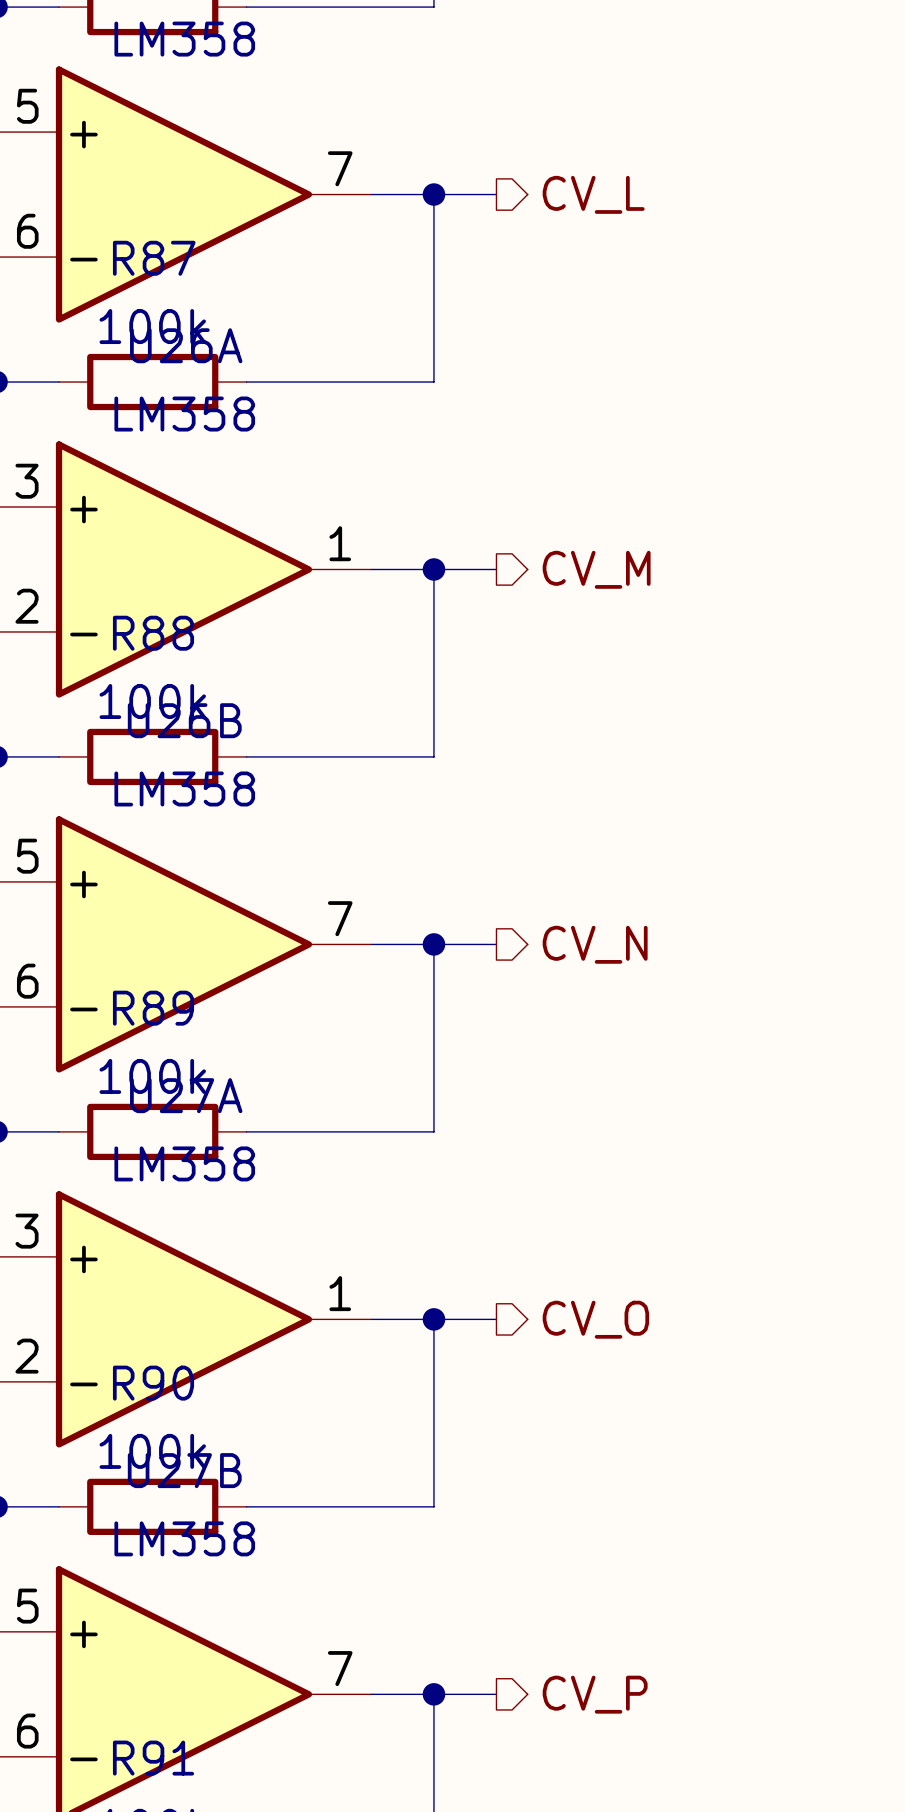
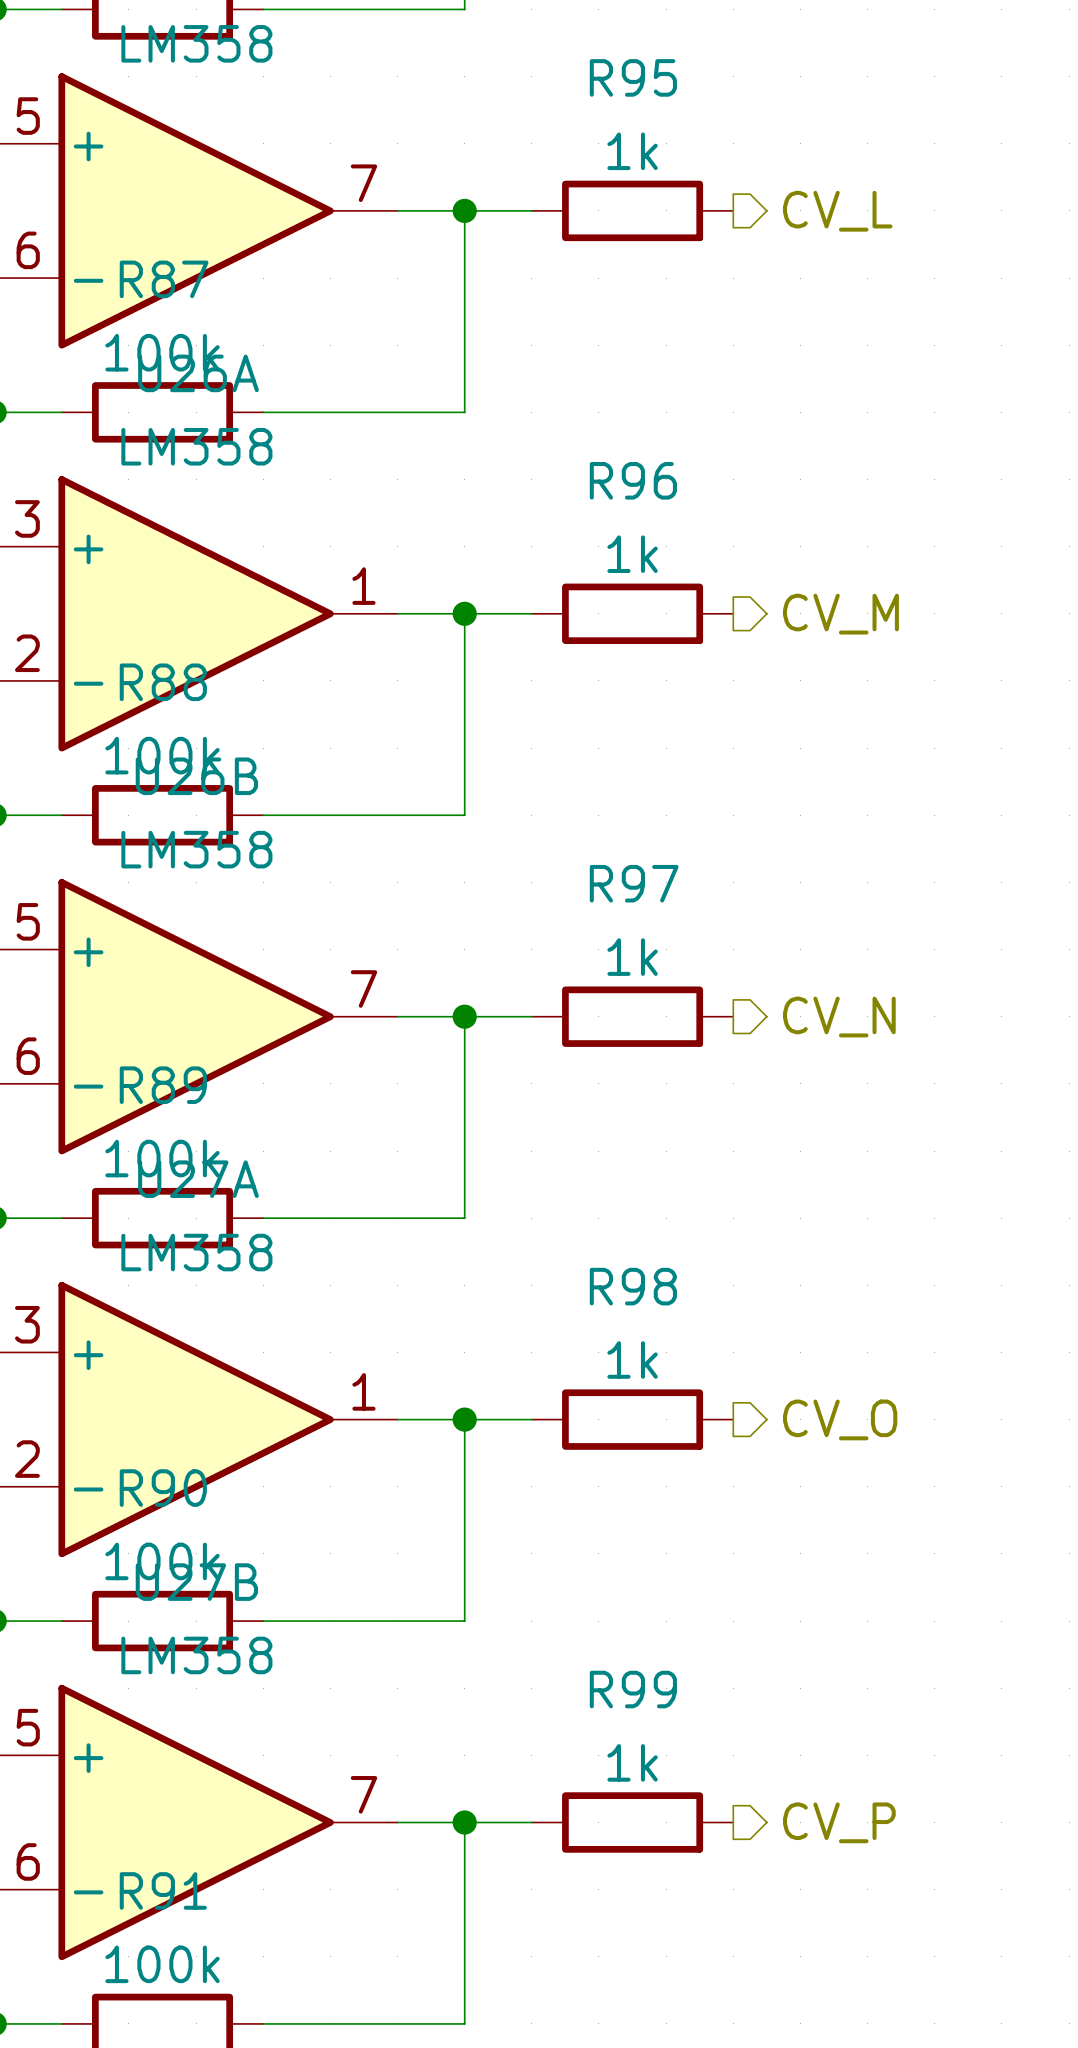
R95: none -> 1k (632, 210)
hierarchical label position: CV_L (593, 194) -> CV_L (837, 211)
R96: none -> 1k (632, 613)
hierarchical label position: CV_M (596, 569) -> CV_M (840, 614)
R97: none -> 1k (632, 1016)
hierarchical label position: CV_N (595, 944) -> CV_N (839, 1017)
R98: none -> 1k (632, 1419)
hierarchical label position: CV_O (595, 1319) -> CV_O (840, 1419)
R99: none -> 1k (632, 1822)
hierarchical label position: CV_P (595, 1694) -> CV_P (839, 1822)

